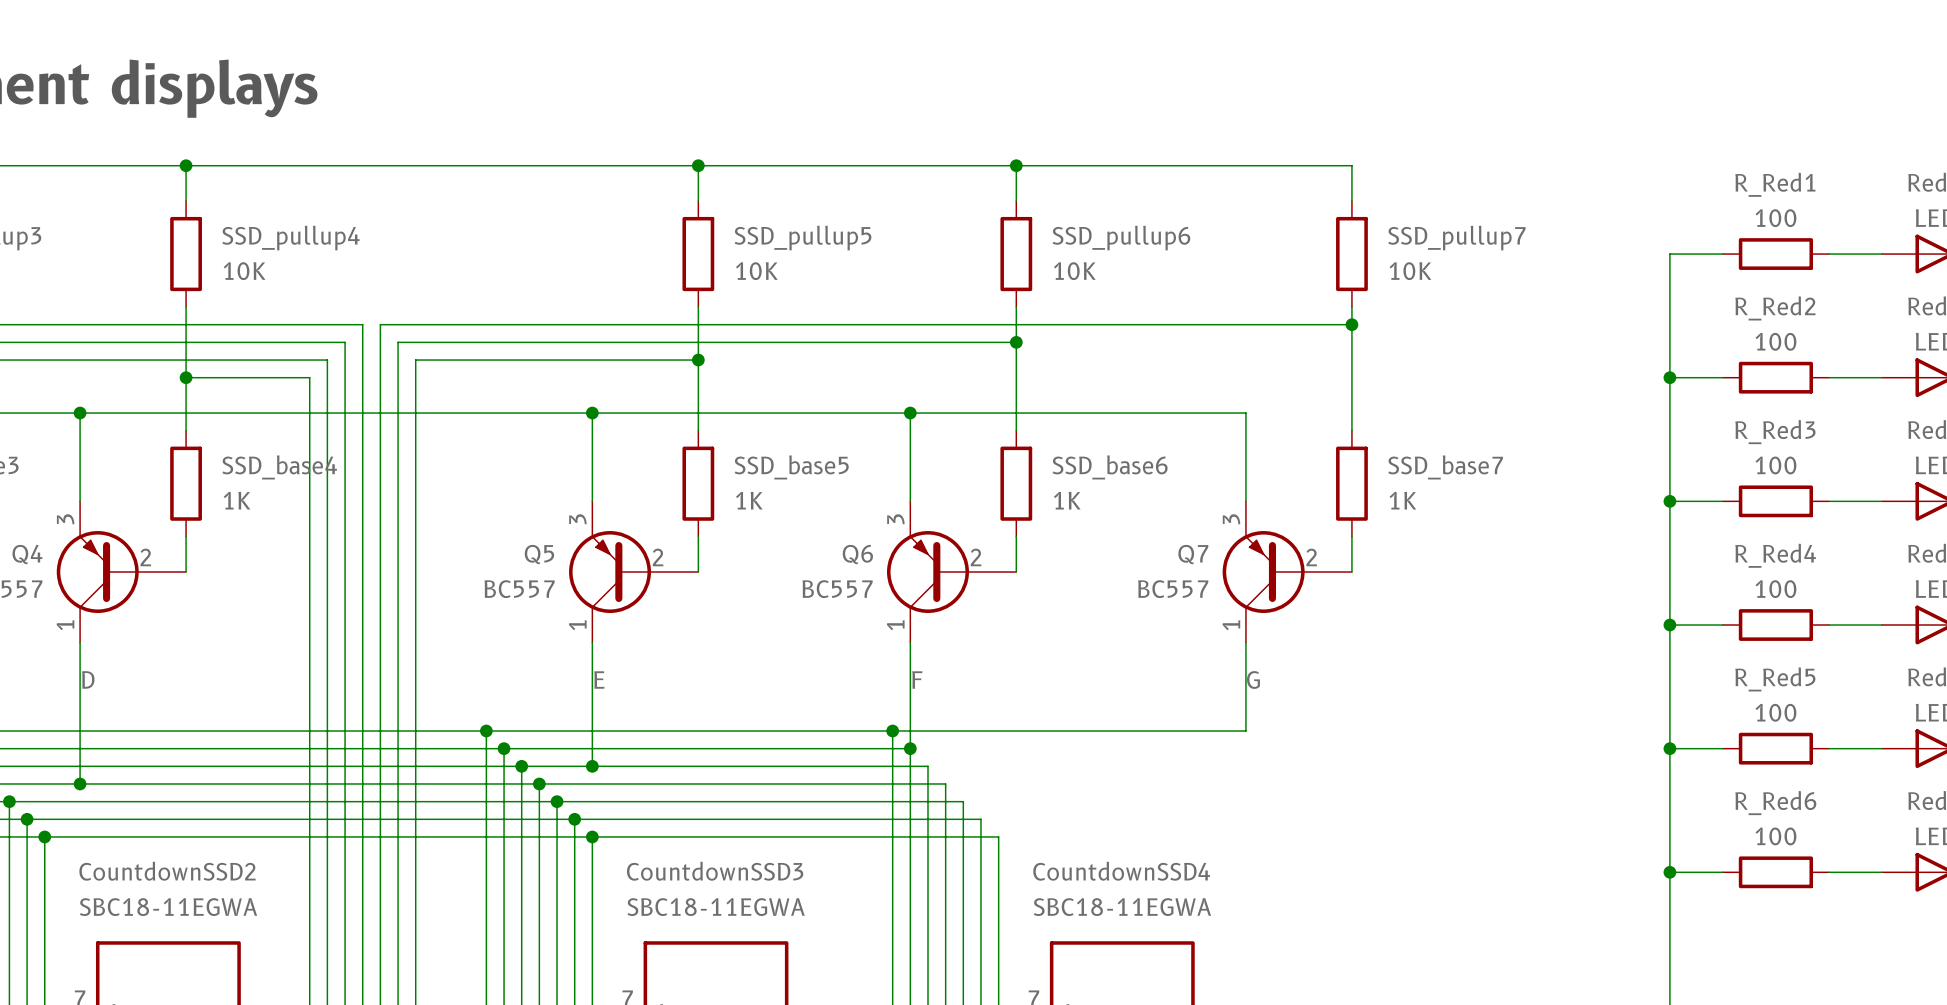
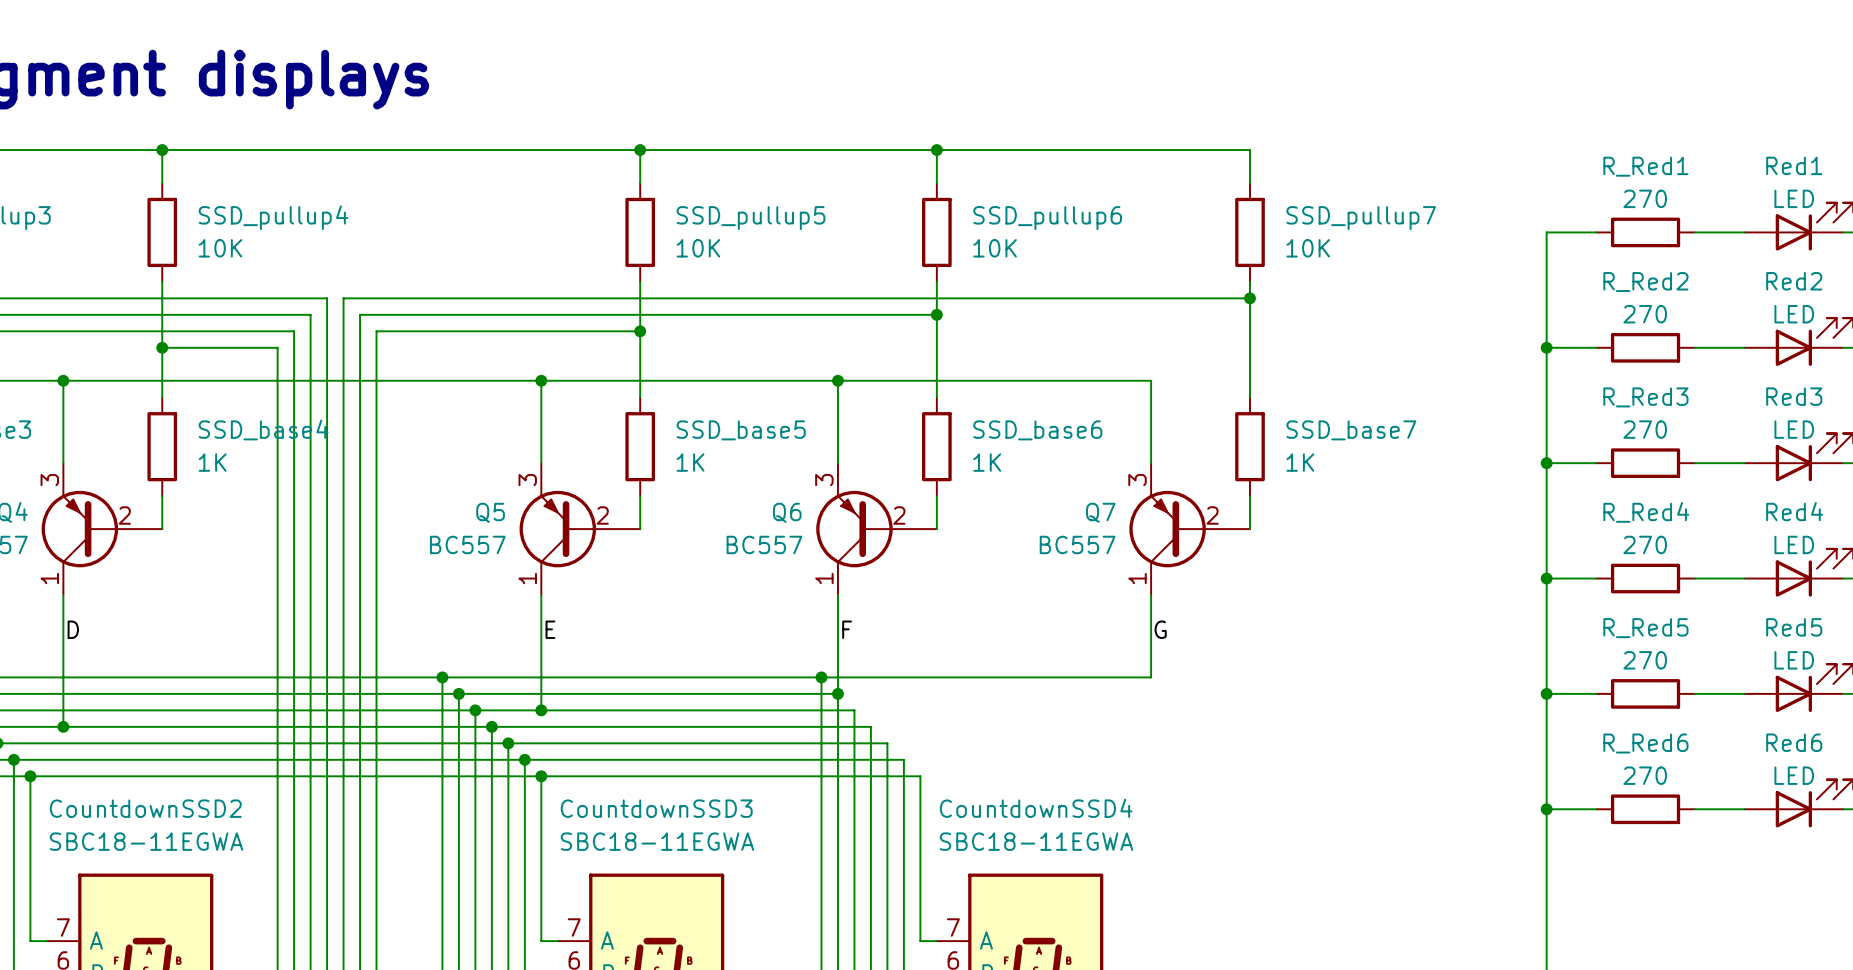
R_Red1 value: 100 (1775, 218) -> 270 (1645, 198)
R_Red2 value: 100 (1775, 341) -> 270 (1645, 314)
R_Red3 value: 100 (1775, 465) -> 270 (1645, 429)
R_Red4 value: 100 (1775, 589) -> 270 (1645, 544)
R_Red5 value: 100 (1775, 712) -> 270 (1645, 660)
R_Red6 value: 100 (1775, 836) -> 270 (1645, 775)

